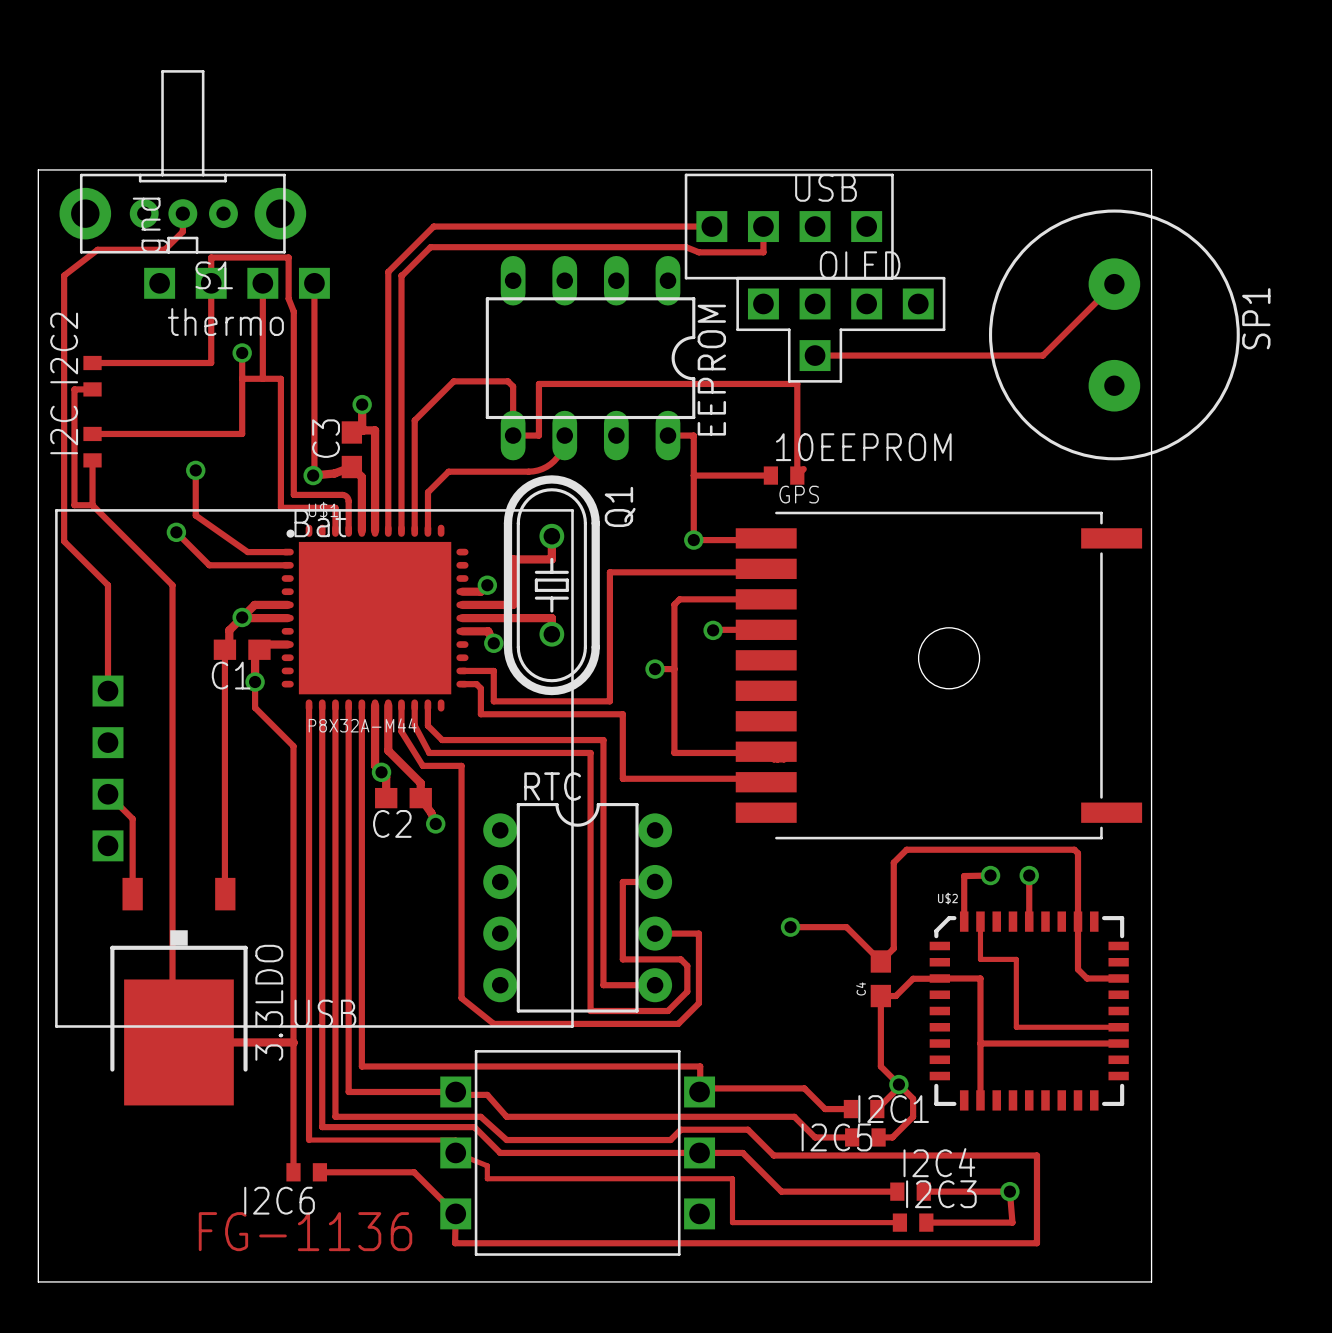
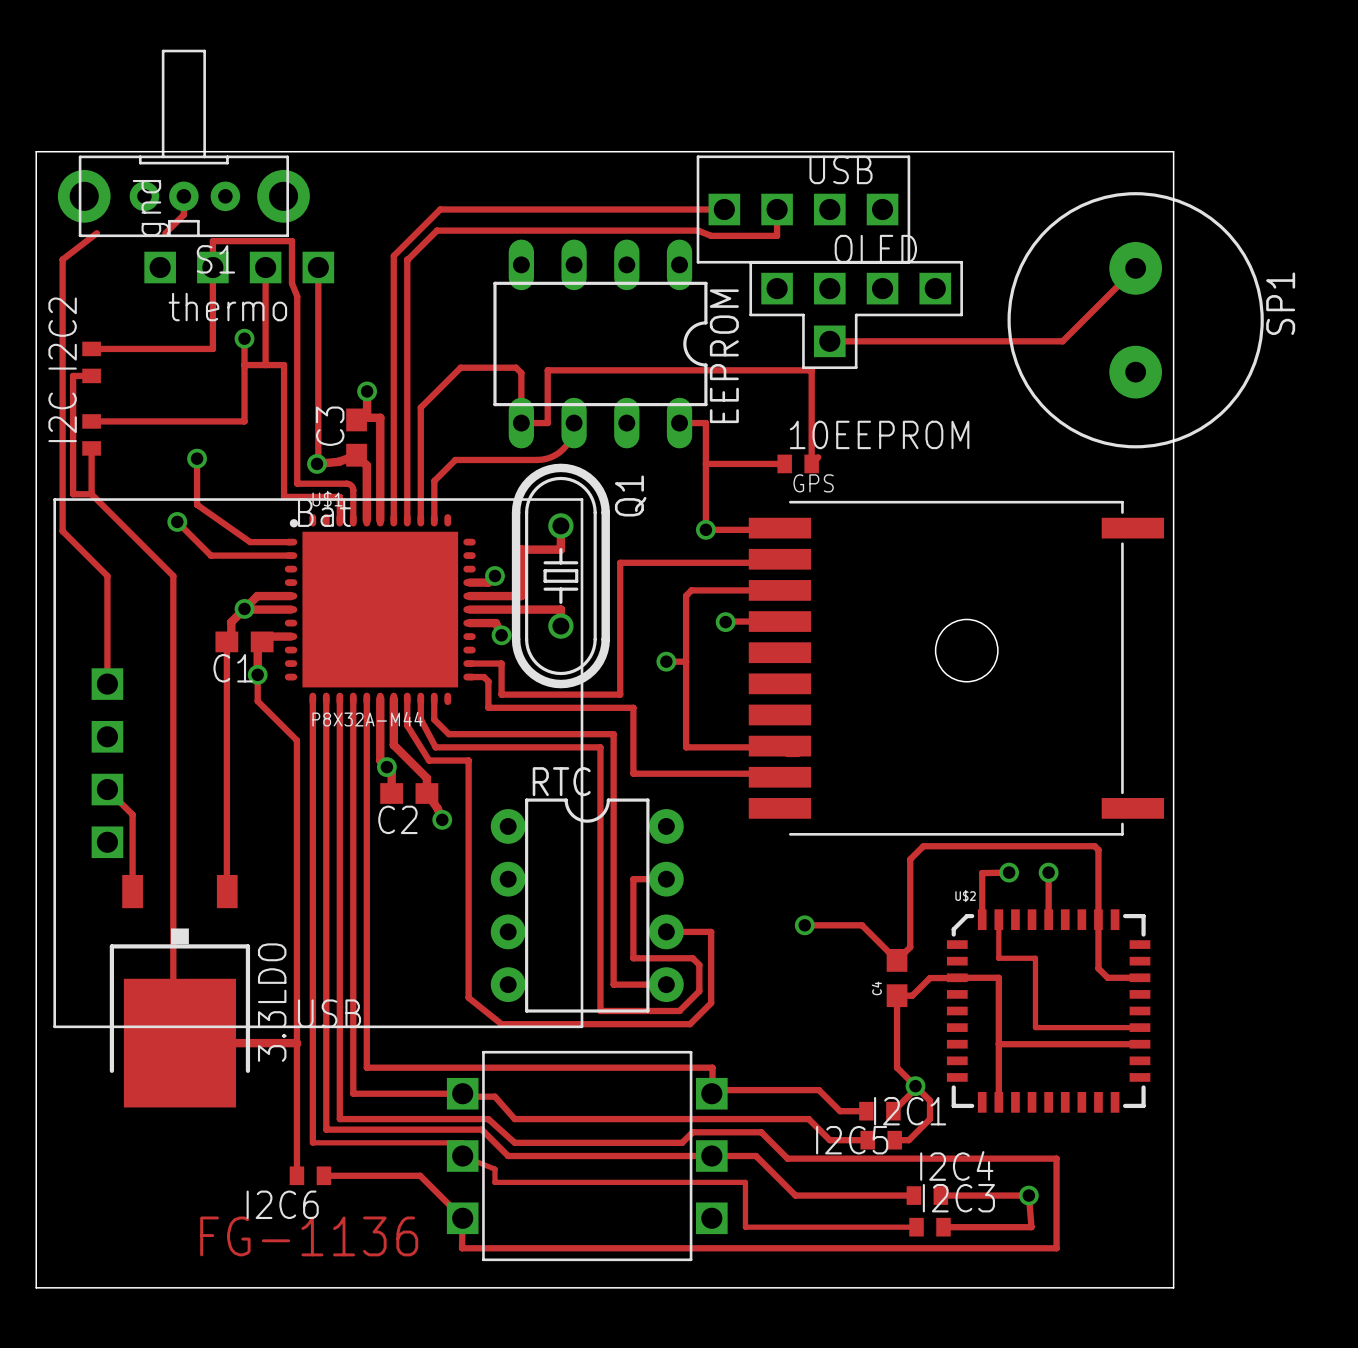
track: (97, 249) (164, 249) -> none

